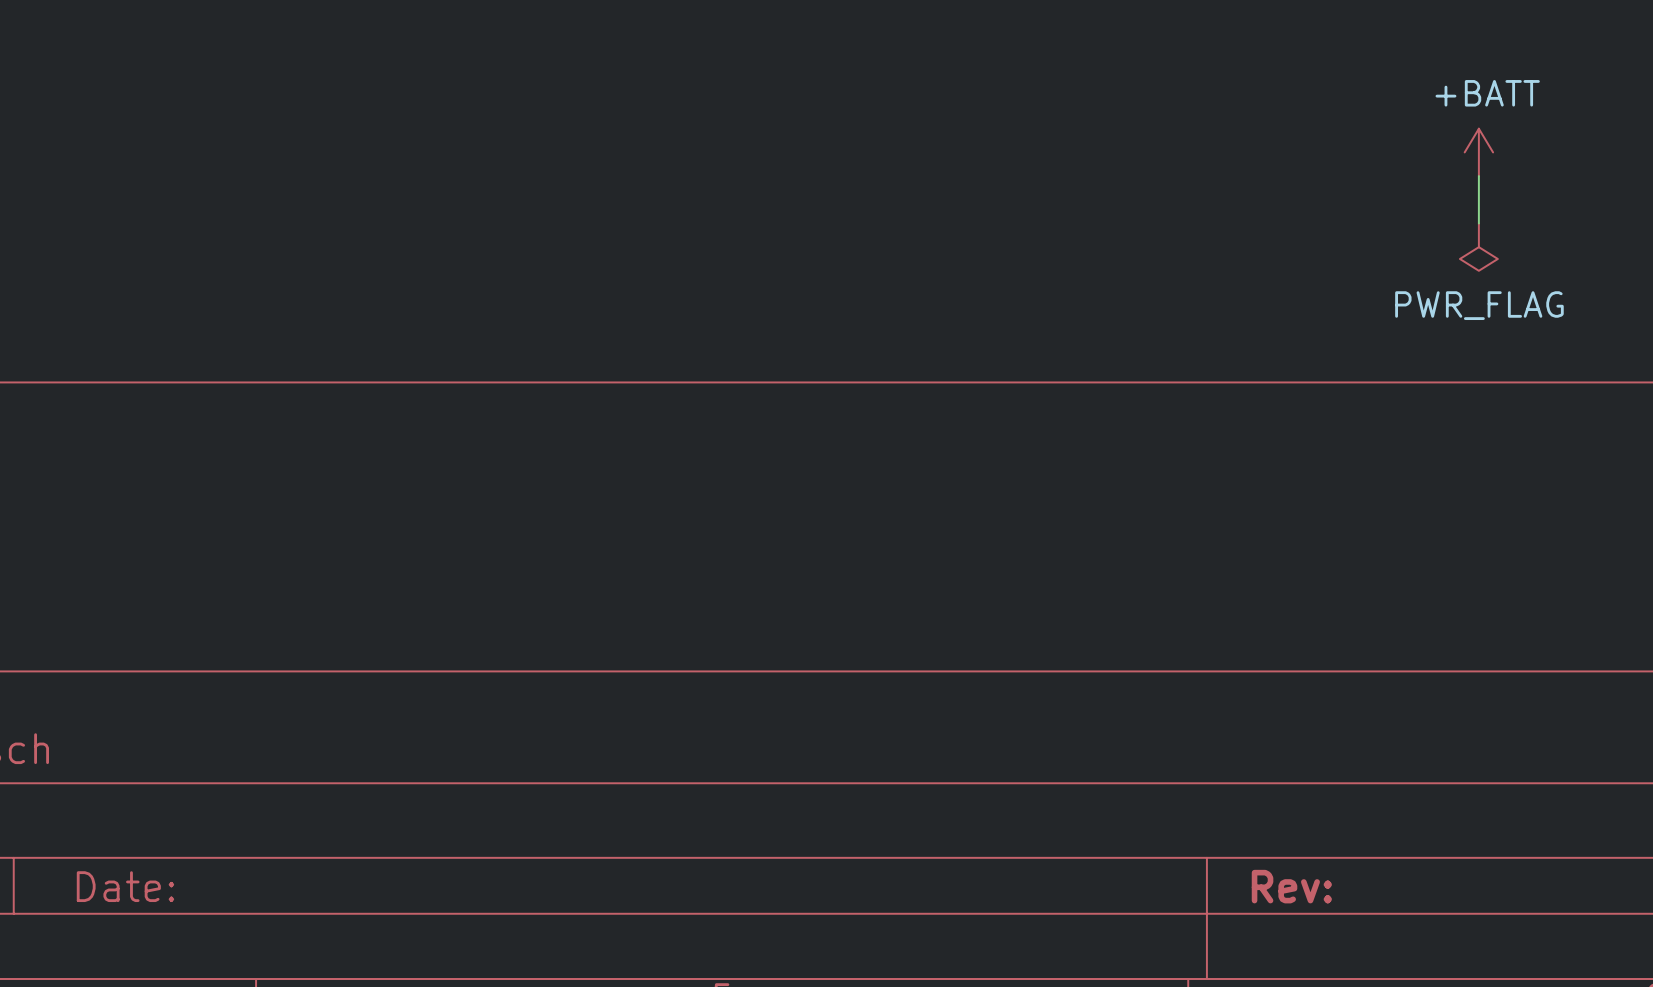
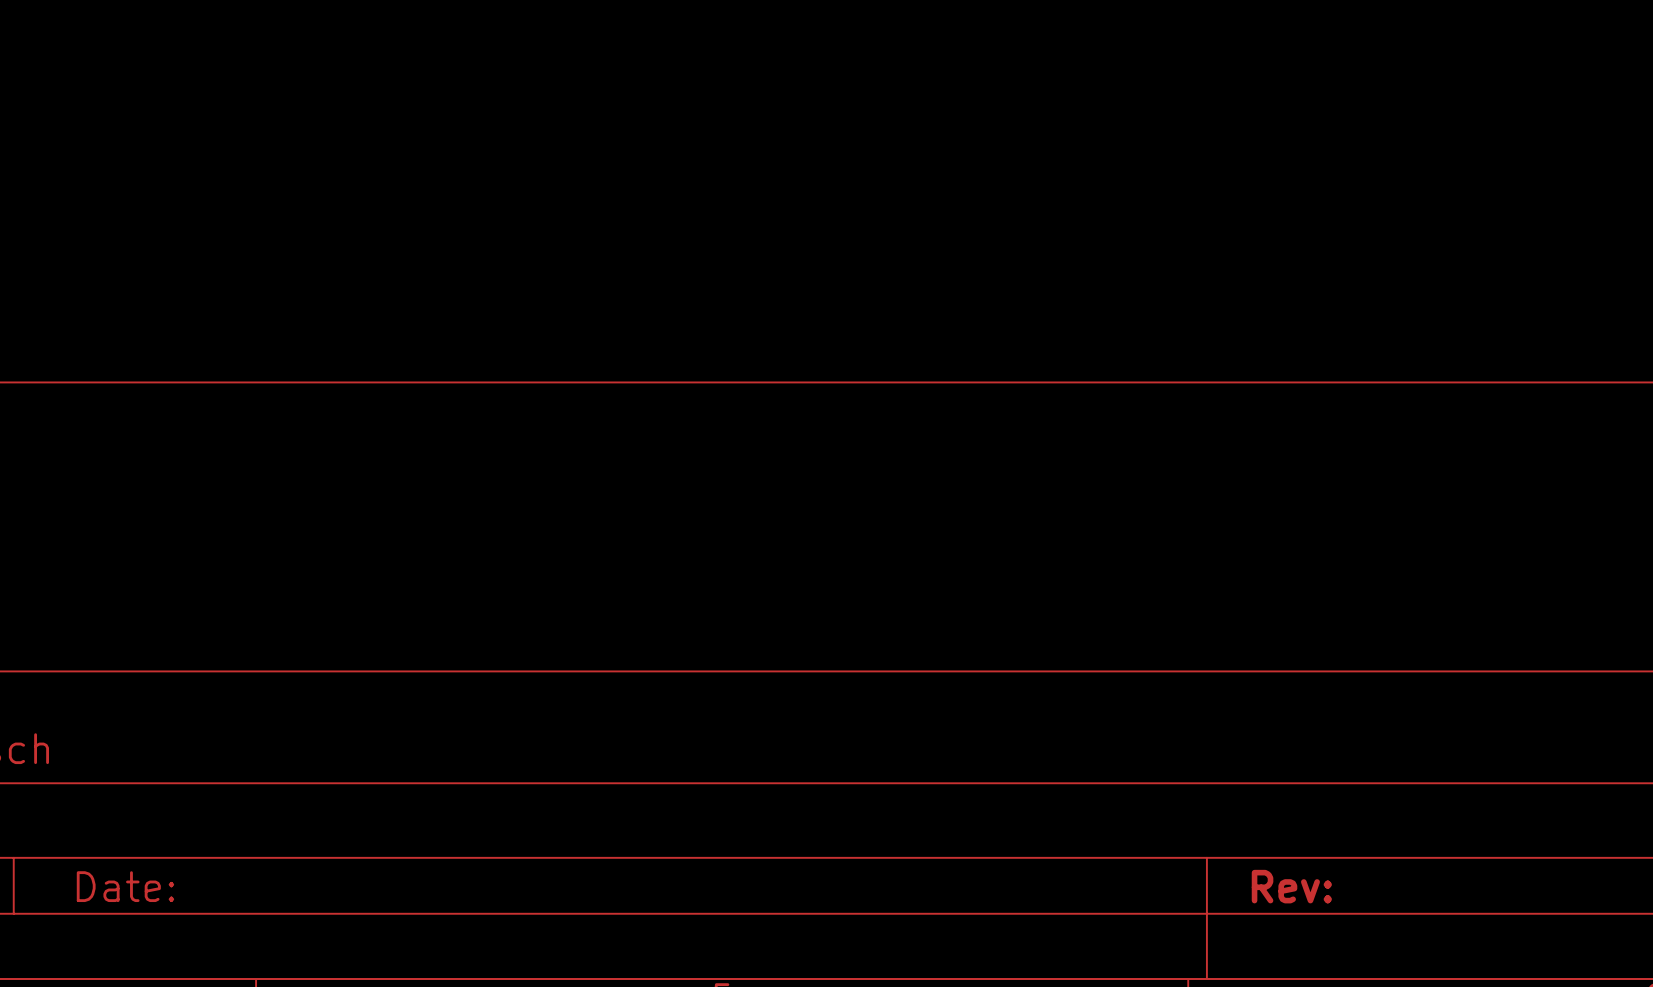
power symbol: +BATT (1478, 152) -> none
wire: (1478, 176) (1478, 223) -> none
power symbol: PWR_FLAG (1478, 247) -> none

